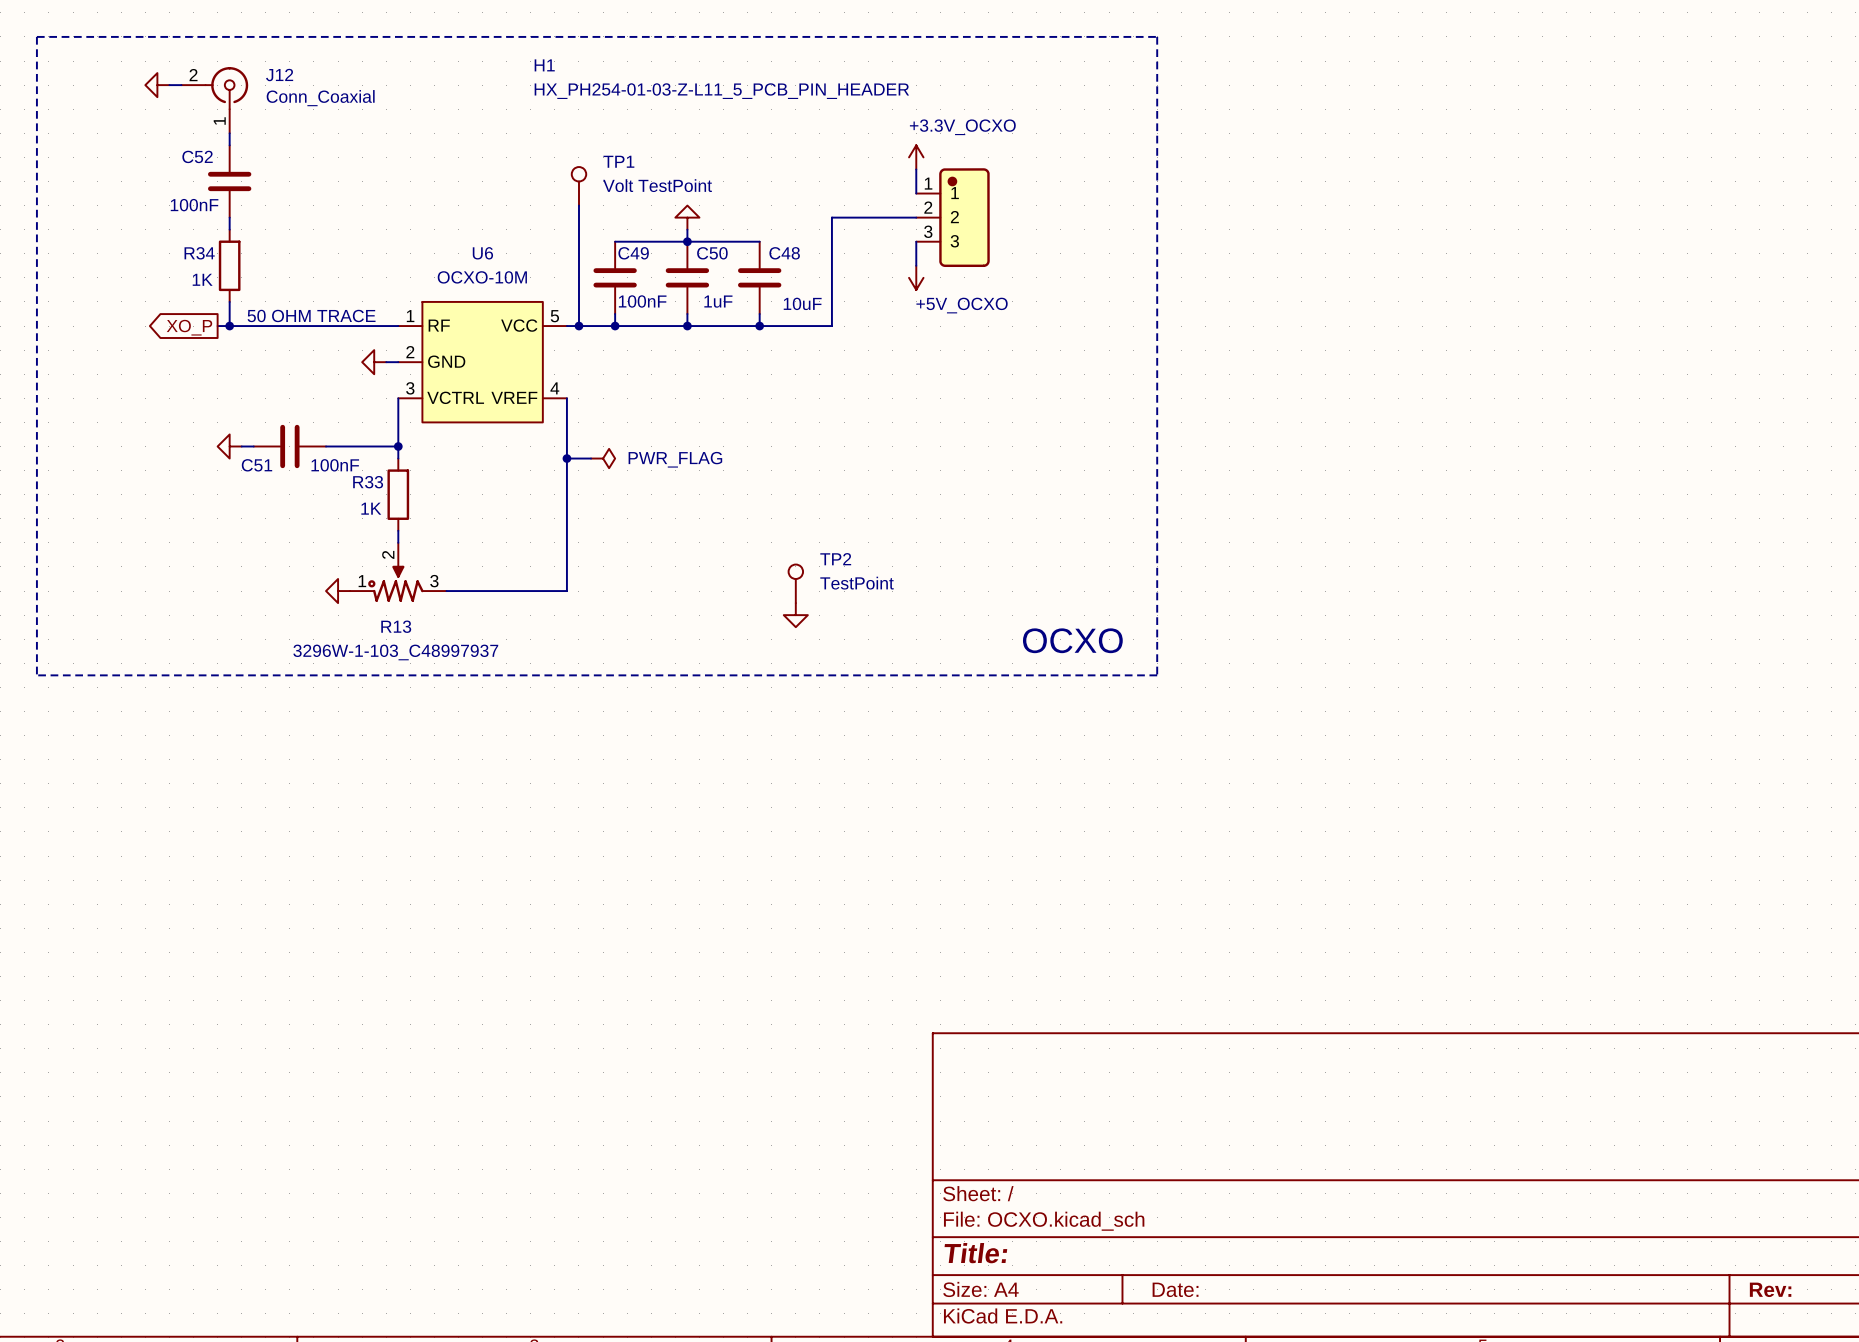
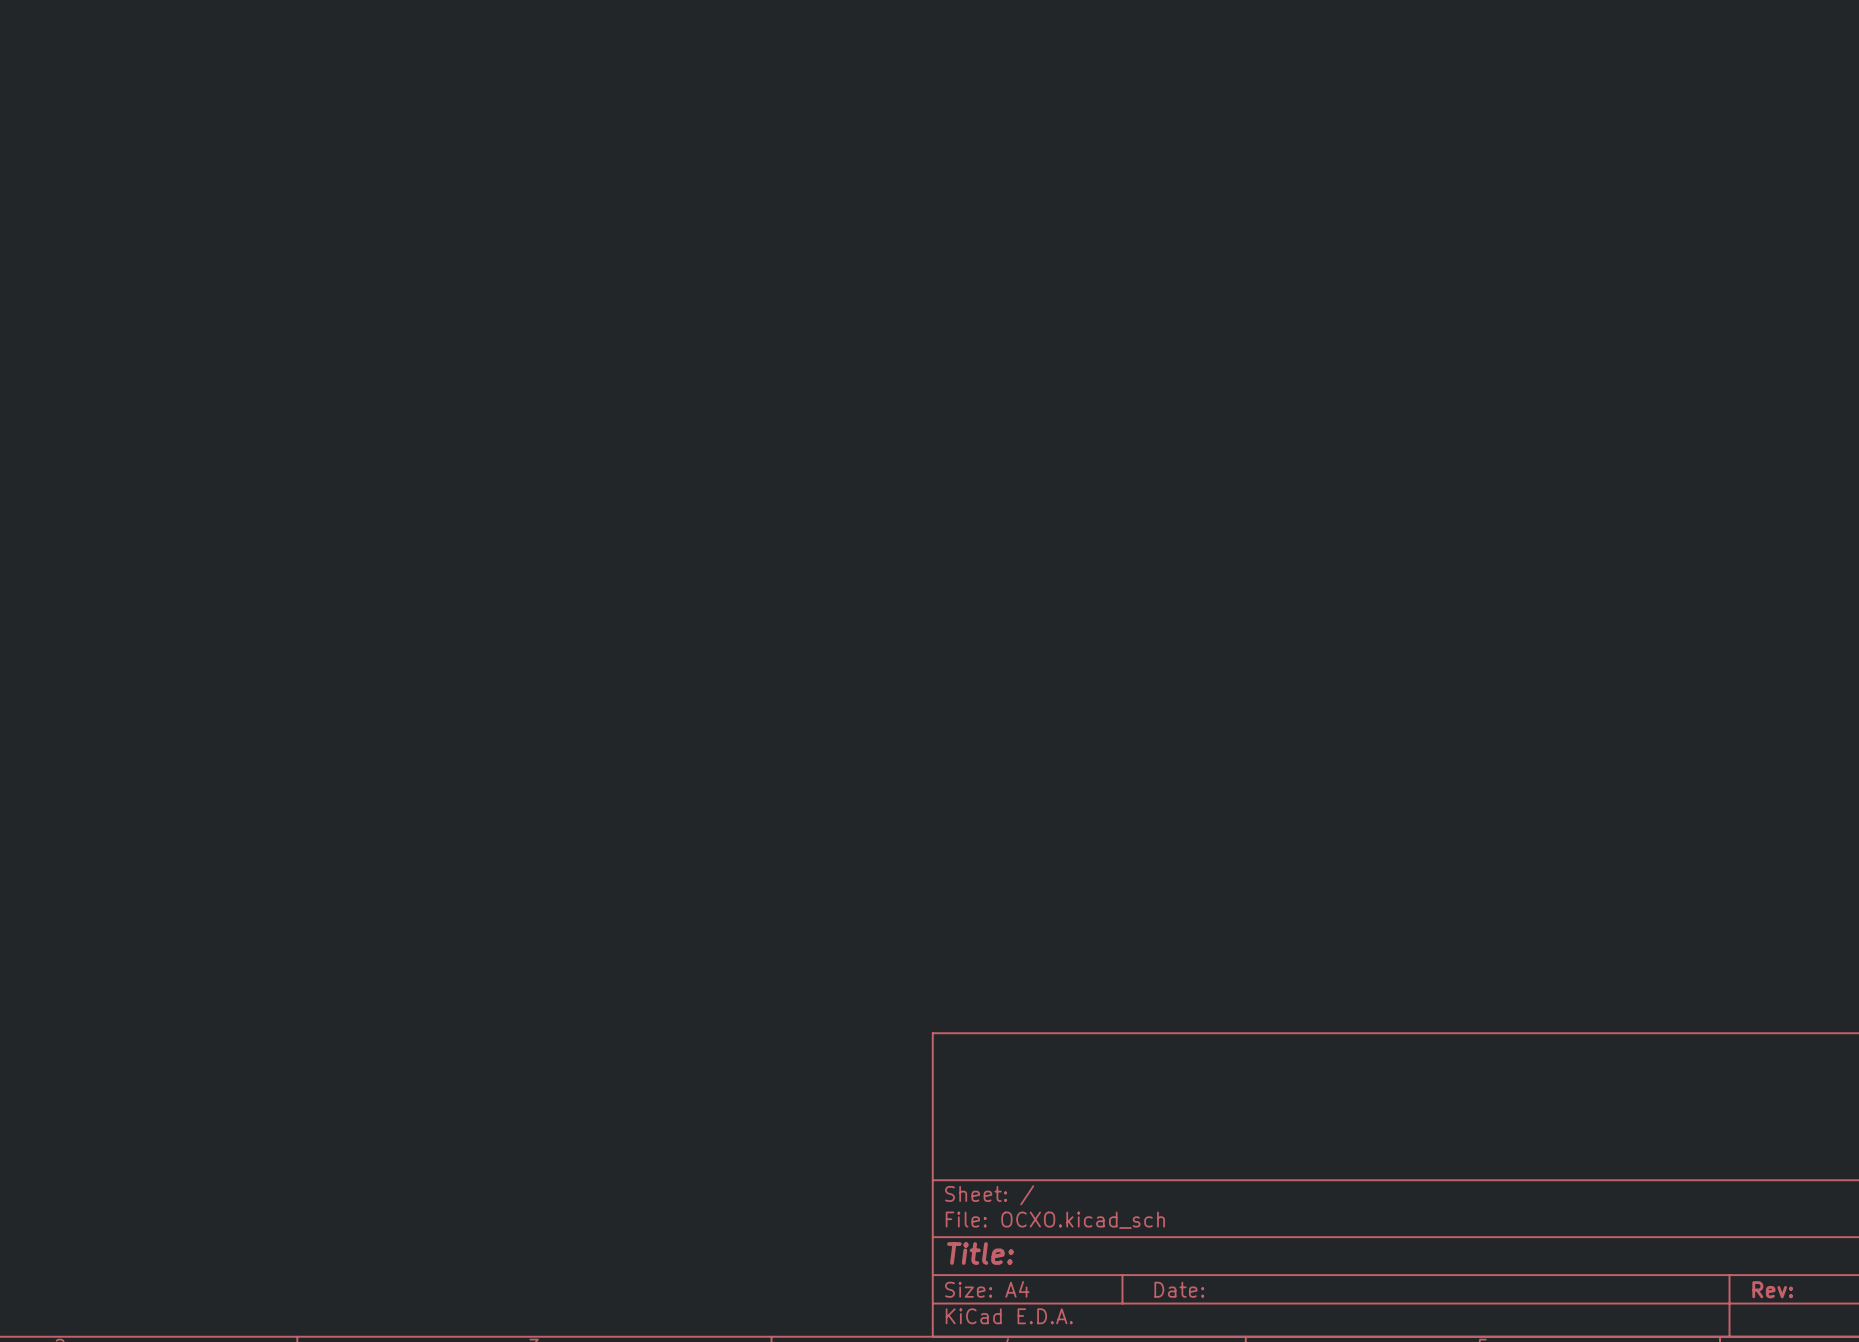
line: (36, 36) (1157, 36) (1157, 675) (36, 675) (36, 36) -> none
power symbol: (157, 85) -> none
wire: (169, 85) (181, 85) -> none
J12: Conn_Coaxial (214, 100) -> none
wire: (229, 133) (229, 145) -> none
power symbol: +3.3V_OCXO (916, 157) -> none
wire: (916, 169) (916, 193) -> none
C52: 100nF (229, 181) -> none
TP1: Volt TestPoint (578, 186) -> none
wire: (578, 205) (578, 326) -> none
wire: (229, 217) (229, 229) -> none
power symbol: (687, 217) -> none
wire: (916, 217) (831, 217) (831, 326) (566, 326) -> none
H1: HX_PH254-01-03-Z-L11_5_PCB_PIN_HEADER (953, 217) -> none
wire: (687, 229) (687, 241) -> none
wire: (615, 241) (759, 241) -> none
junction: (687, 241) -> none
wire: (916, 241) (916, 265) -> none
R34: 1K (229, 265) -> none
C49: 100nF (615, 277) -> none
C50: 1uF (687, 277) -> none
C48: 10uF (759, 277) -> none
power symbol: +5V_OCXO (916, 277) -> none
wire: (229, 301) (229, 326) -> none
wire: (615, 313) (615, 326) -> none
wire: (687, 313) (687, 326) -> none
wire: (759, 313) (759, 326) -> none
text: 50 OHM TRACE (311, 315) -> none
wire: (217, 326) (398, 326) -> none
junction: (229, 326) -> none
junction: (578, 326) -> none
junction: (615, 326) -> none
junction: (687, 326) -> none
junction: (759, 326) -> none
global label: XO_P (189, 327) -> none
power symbol: (374, 362) -> none
wire: (386, 362) (398, 362) -> none
U6: OCXO-10M (482, 362) -> none
wire: (398, 398) (398, 458) -> none
wire: (566, 398) (566, 591) (446, 591) -> none
power symbol: (229, 446) -> none
wire: (241, 446) (253, 446) -> none
C51: 100nF (289, 446) -> none
wire: (326, 446) (398, 446) -> none
junction: (398, 446) -> none
wire: (566, 458) (591, 458) -> none
junction: (566, 458) -> none
power symbol: PWR_FLAG (603, 458) -> none
R33: 1K (398, 494) -> none
wire: (398, 530) (398, 542) -> none
R13: 3296W-1-103_C48997937 (398, 572) -> none
TP2: TestPoint (795, 583) -> none
power symbol: (338, 591) -> none
power symbol: (795, 615) -> none
text: OCXO (1072, 640) -> none

